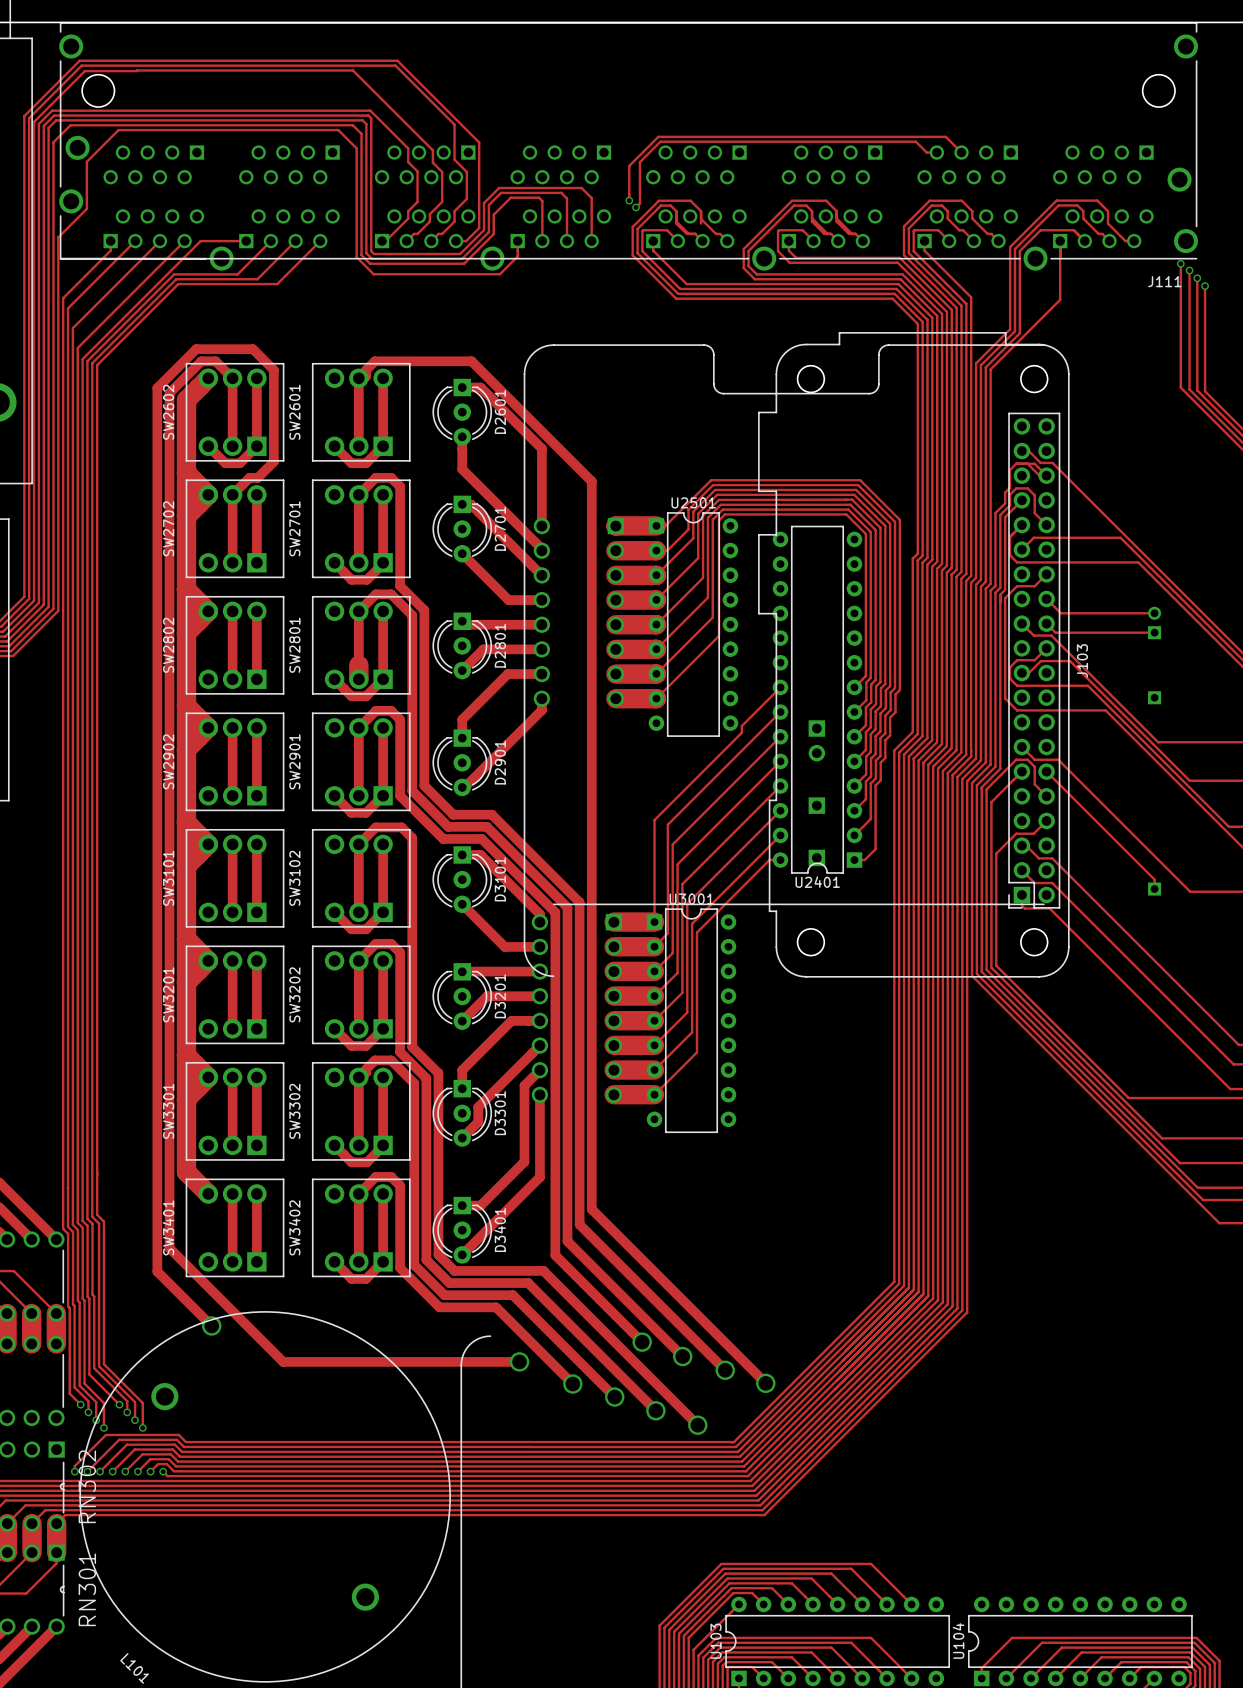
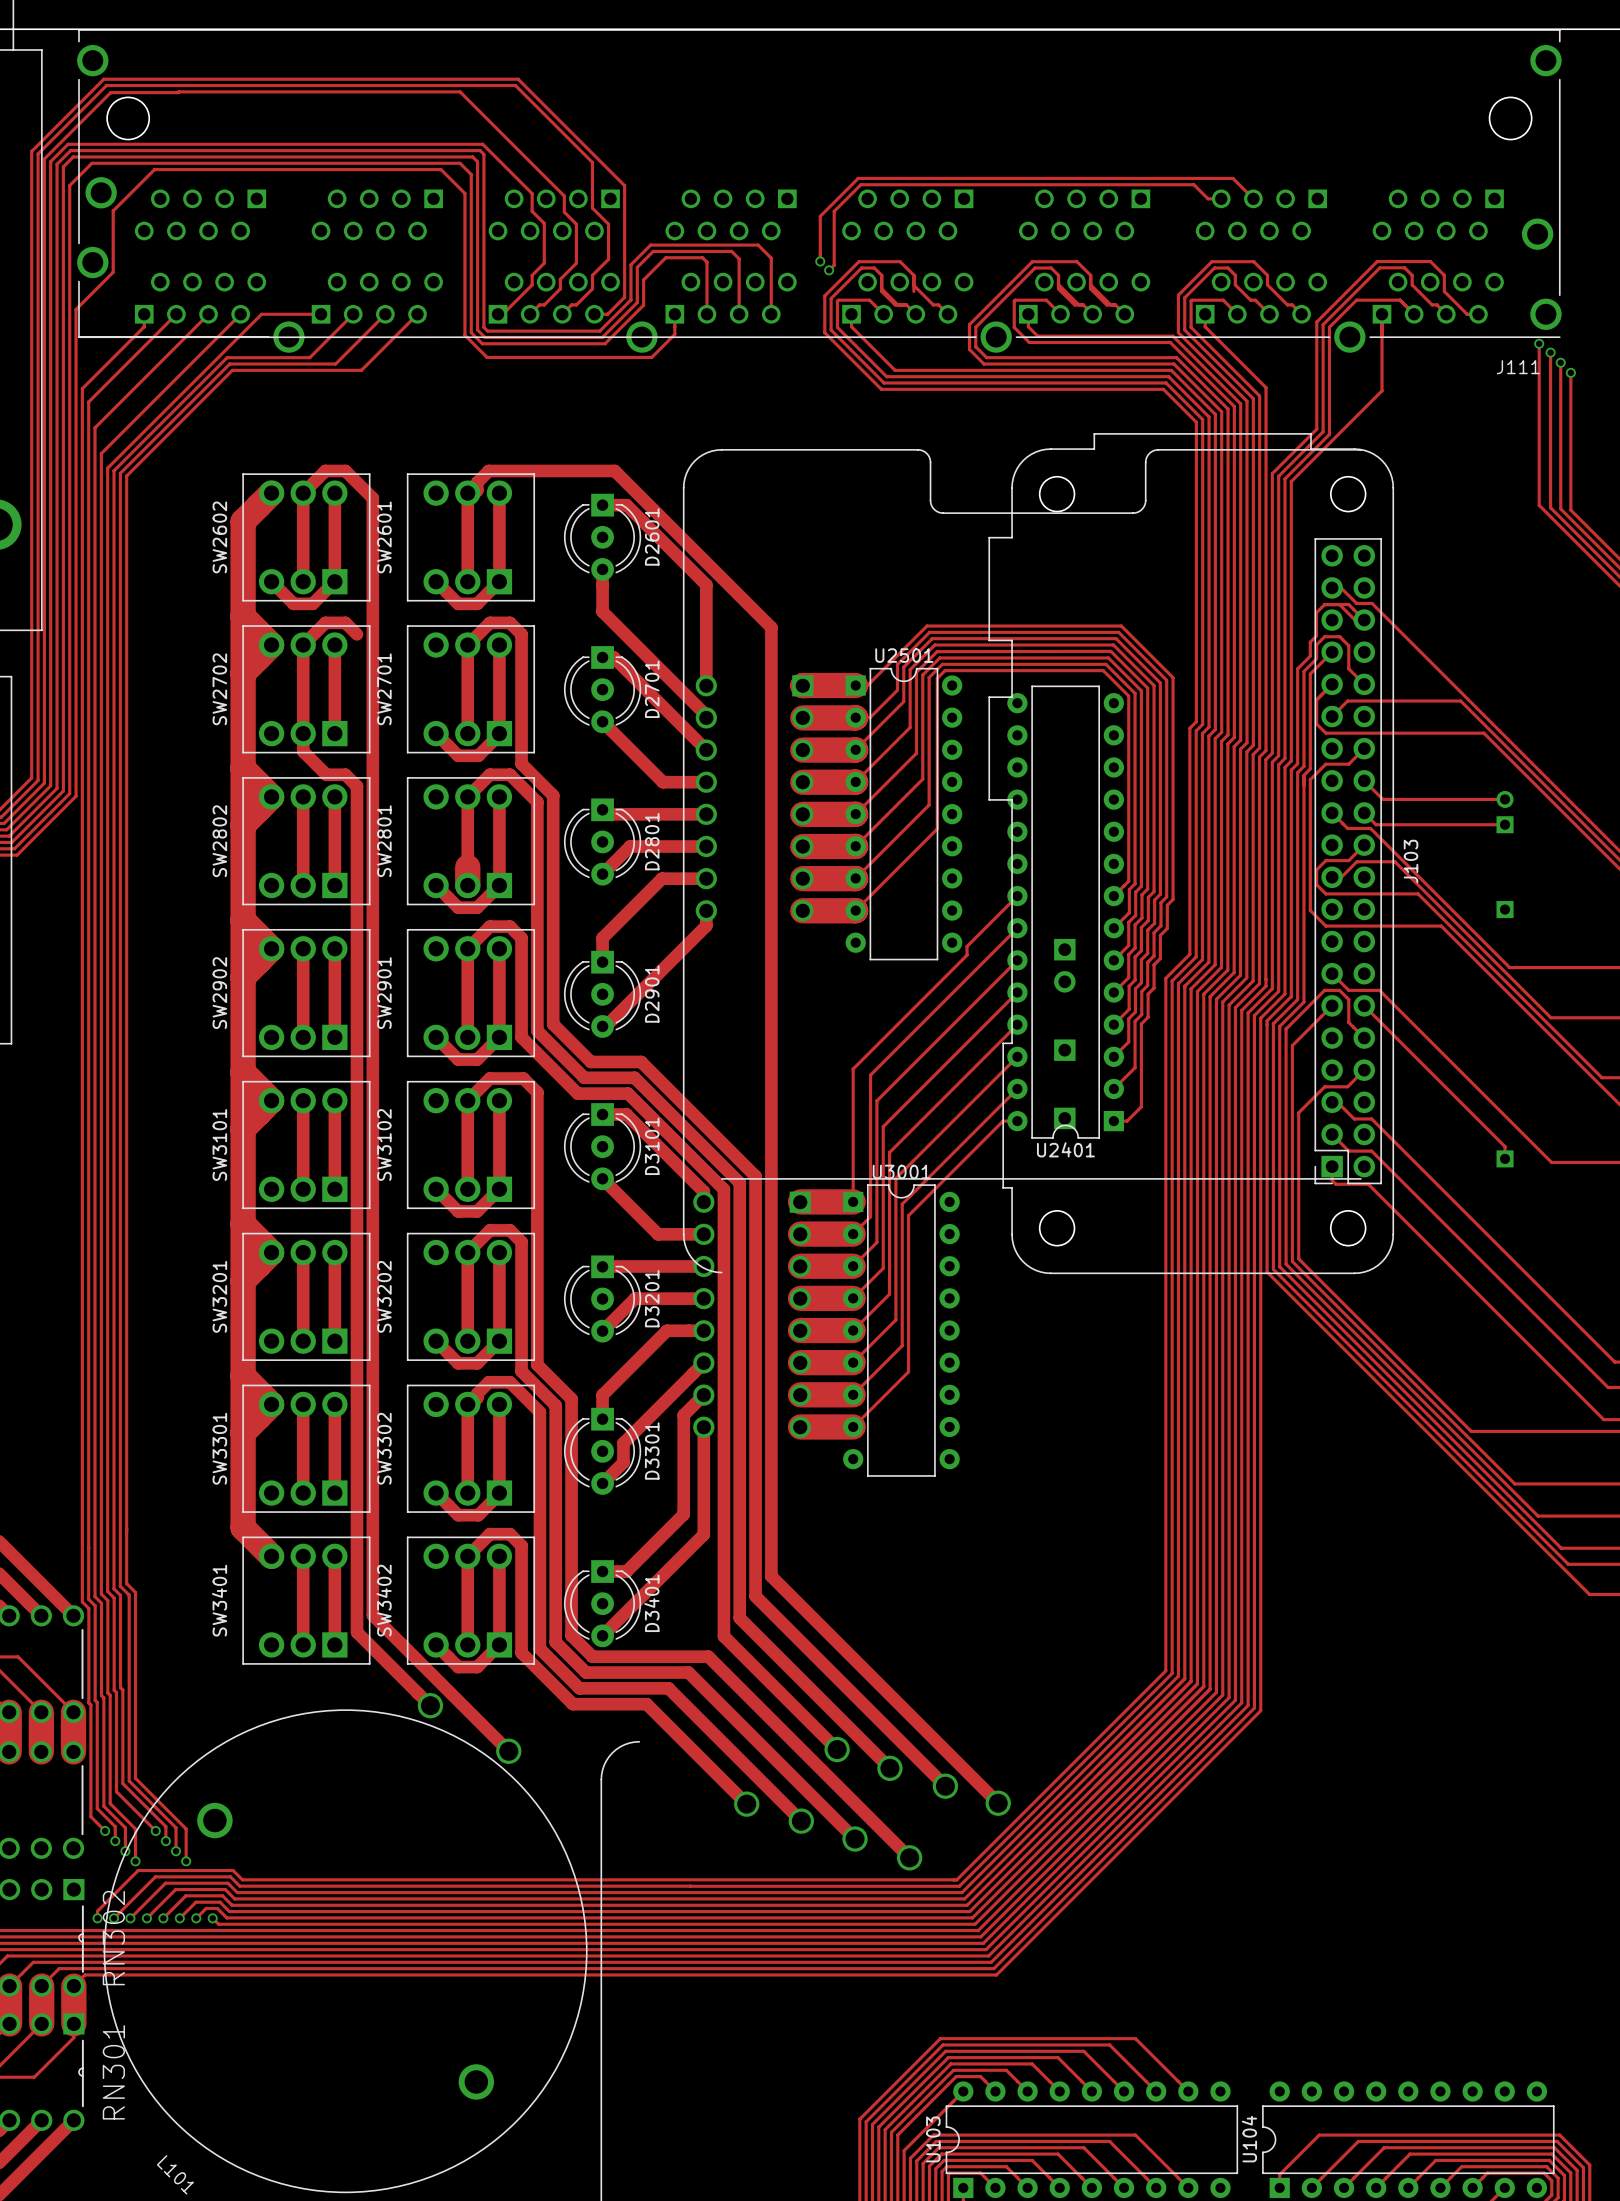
track: (265, 361) (252, 349) (196, 349) (157, 388) (157, 1271) (211, 1325) -> (345, 470) (325, 470) (303, 493)
track: (273, 370) (273, 461) (257, 477) -> (357, 634) (345, 622) (336, 622)
track: none -> (357, 482) (372, 498) (372, 1615) (508, 1751)
track: (232, 378) (215, 361) (201, 361) (169, 393) (169, 1248) (283, 1361) (519, 1361) -> none
track: none -> (303, 733) (303, 751) (326, 774) (345, 774) (357, 786) (357, 1632) (430, 1705)
via: none -> (430, 1705)
via: (211, 1325) -> none
via: none -> (508, 1751)
via: (519, 1361) -> none

